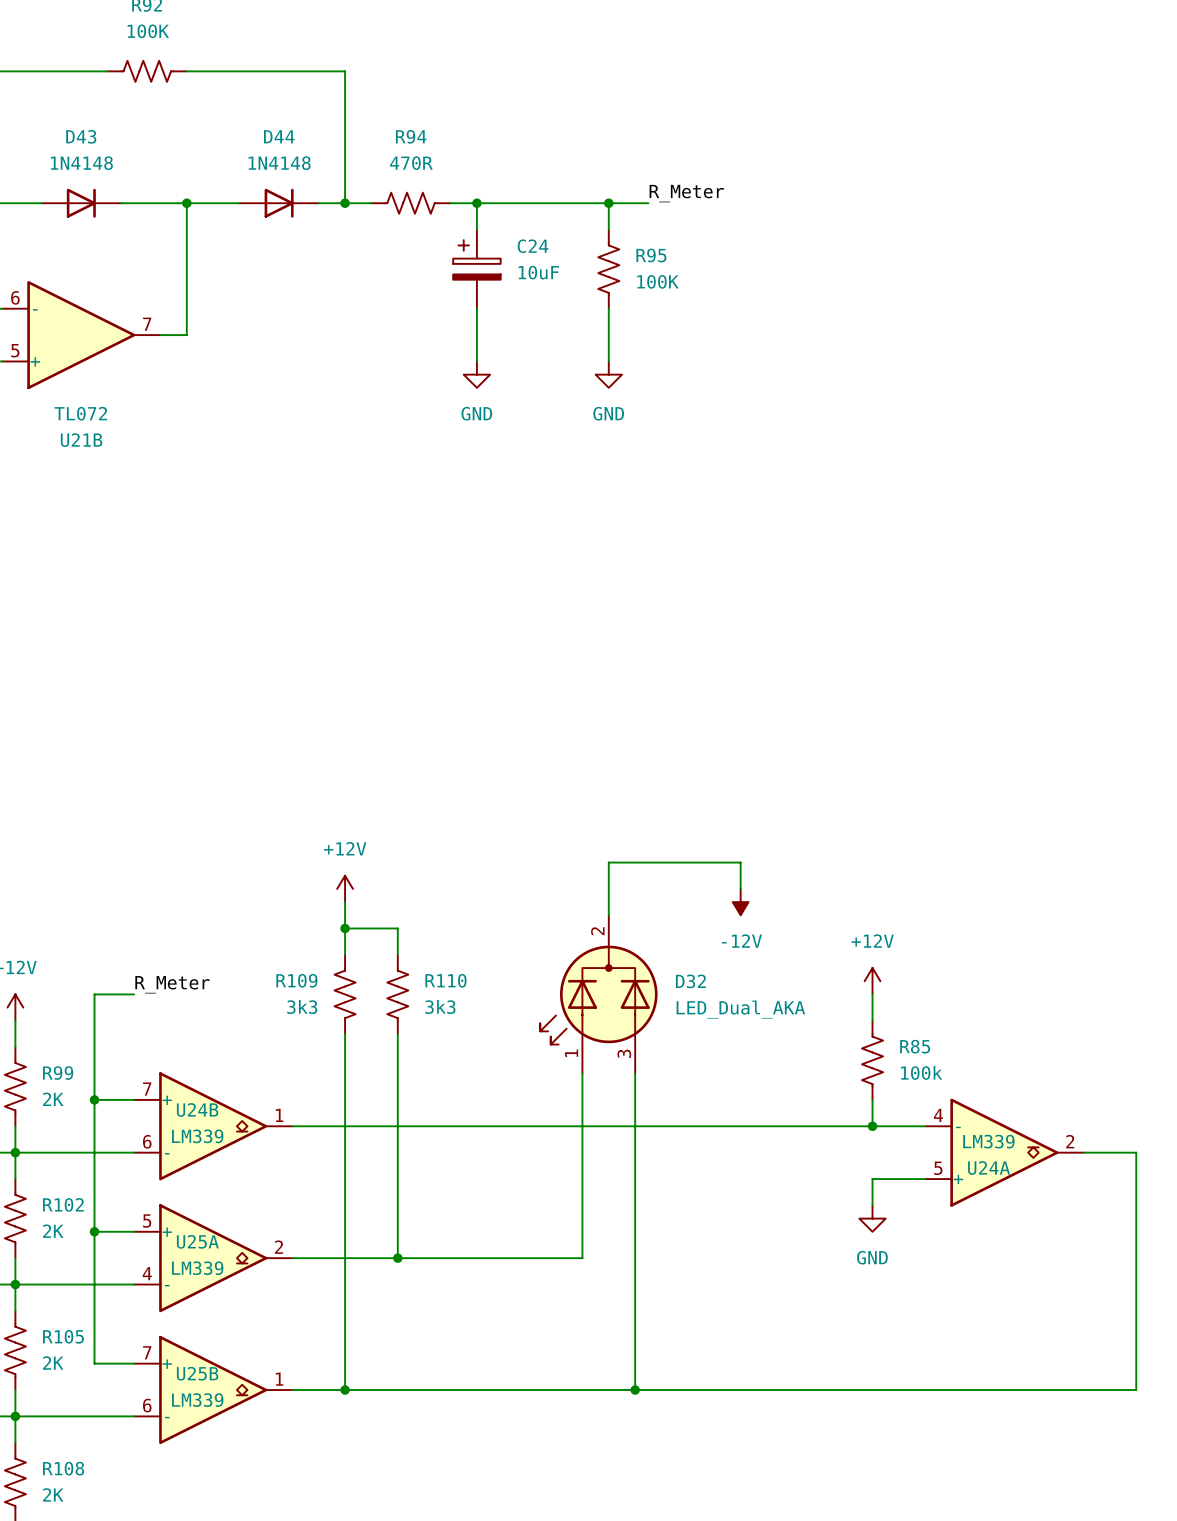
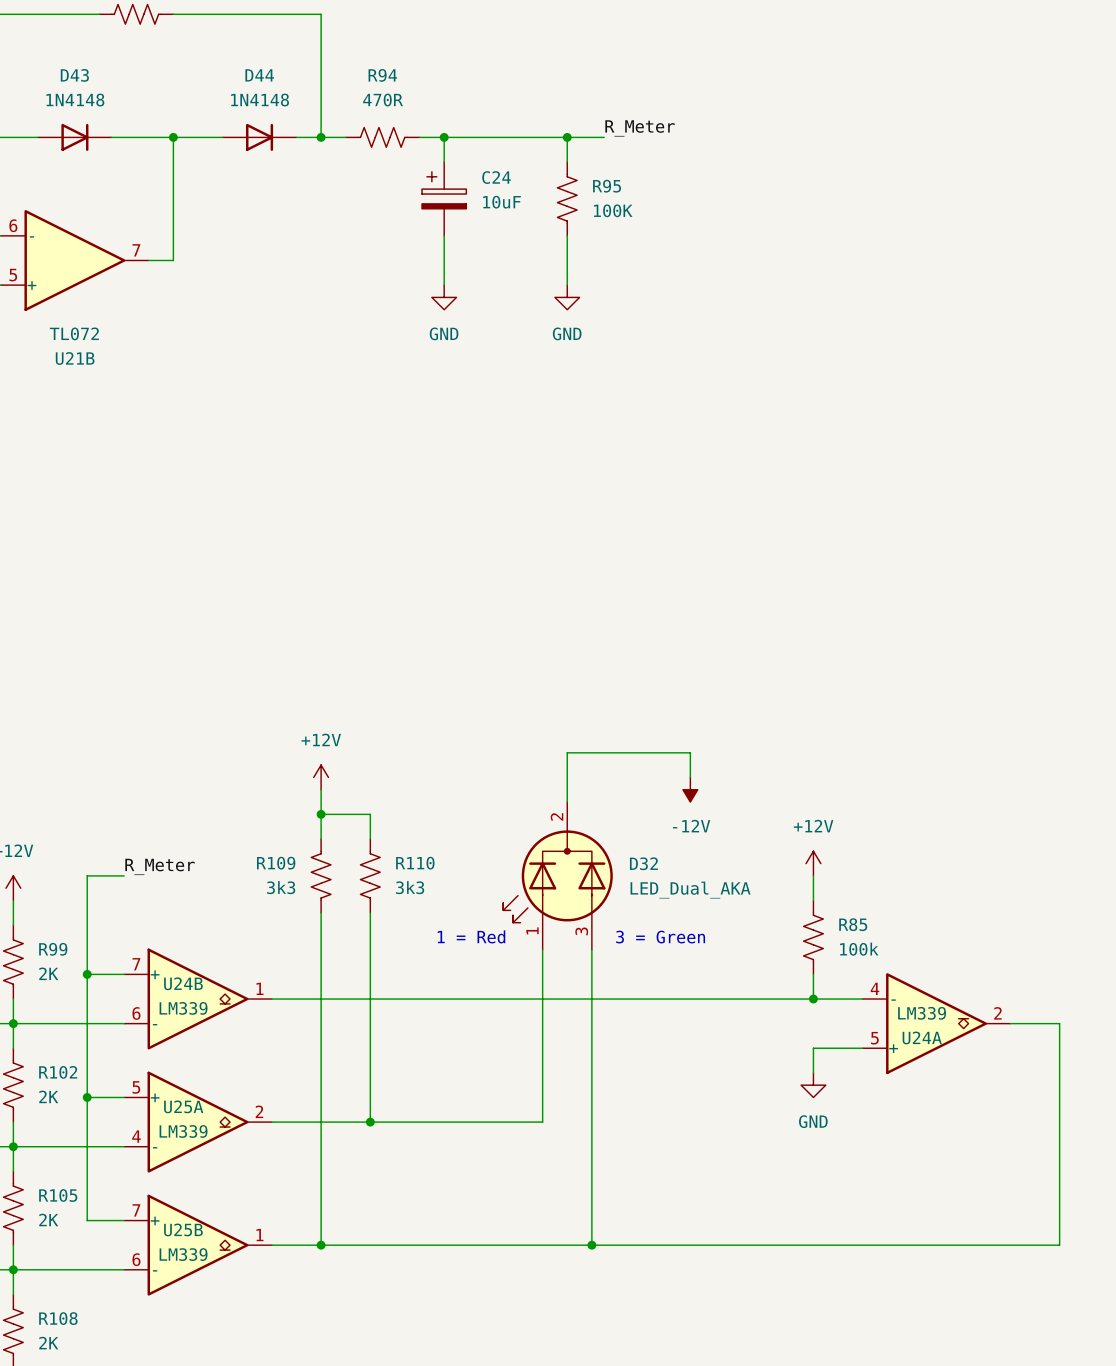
text: none -> 1 = Red (471, 936)
text: none -> 3 = Green (660, 937)

